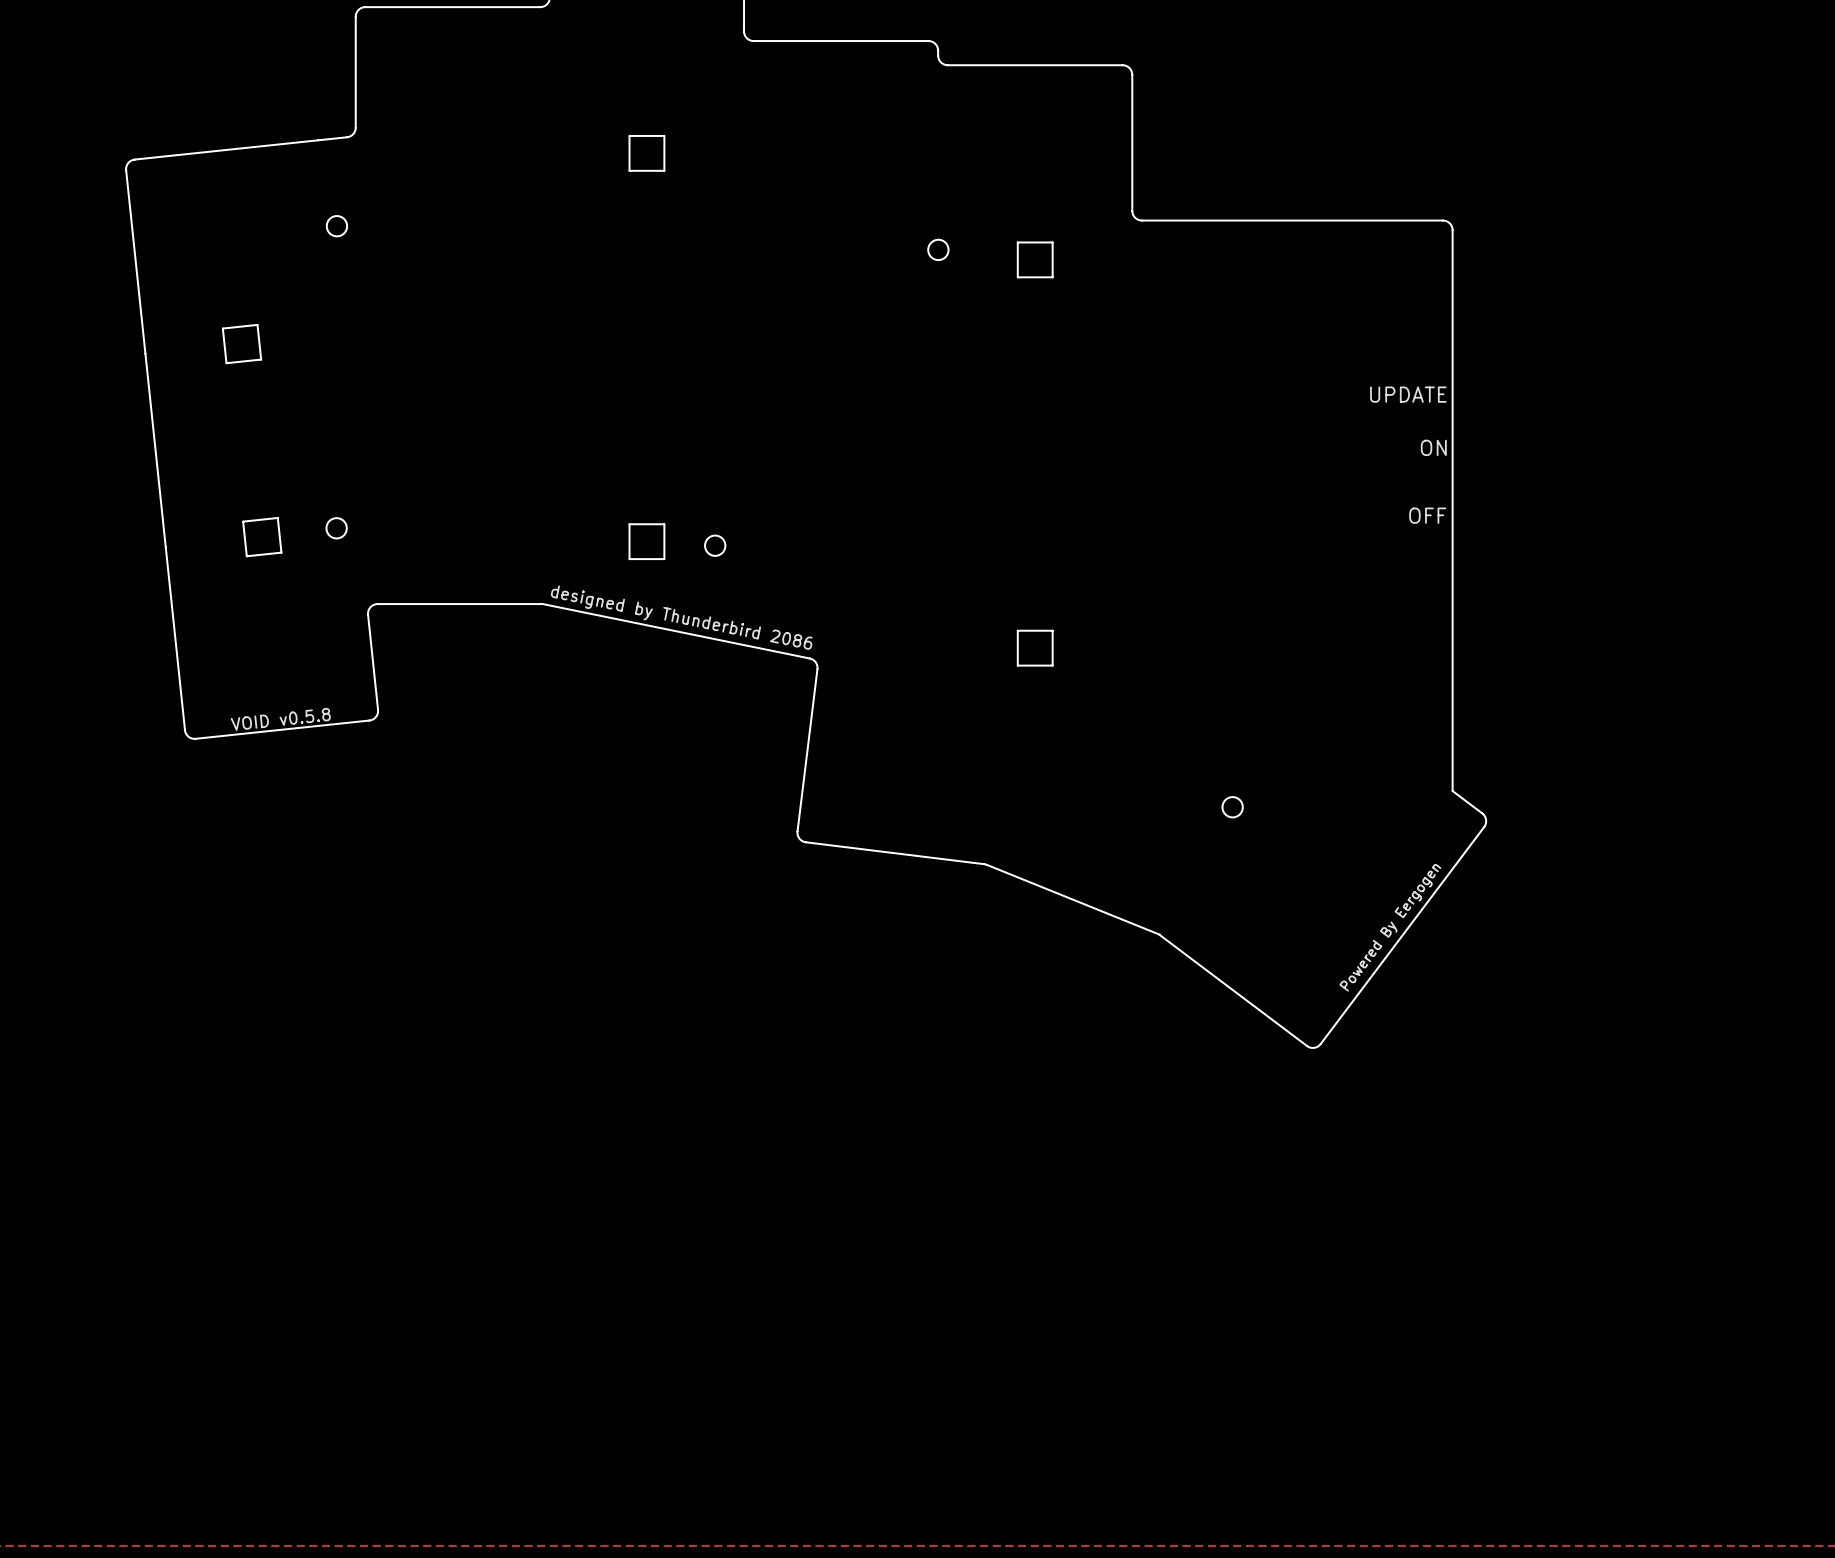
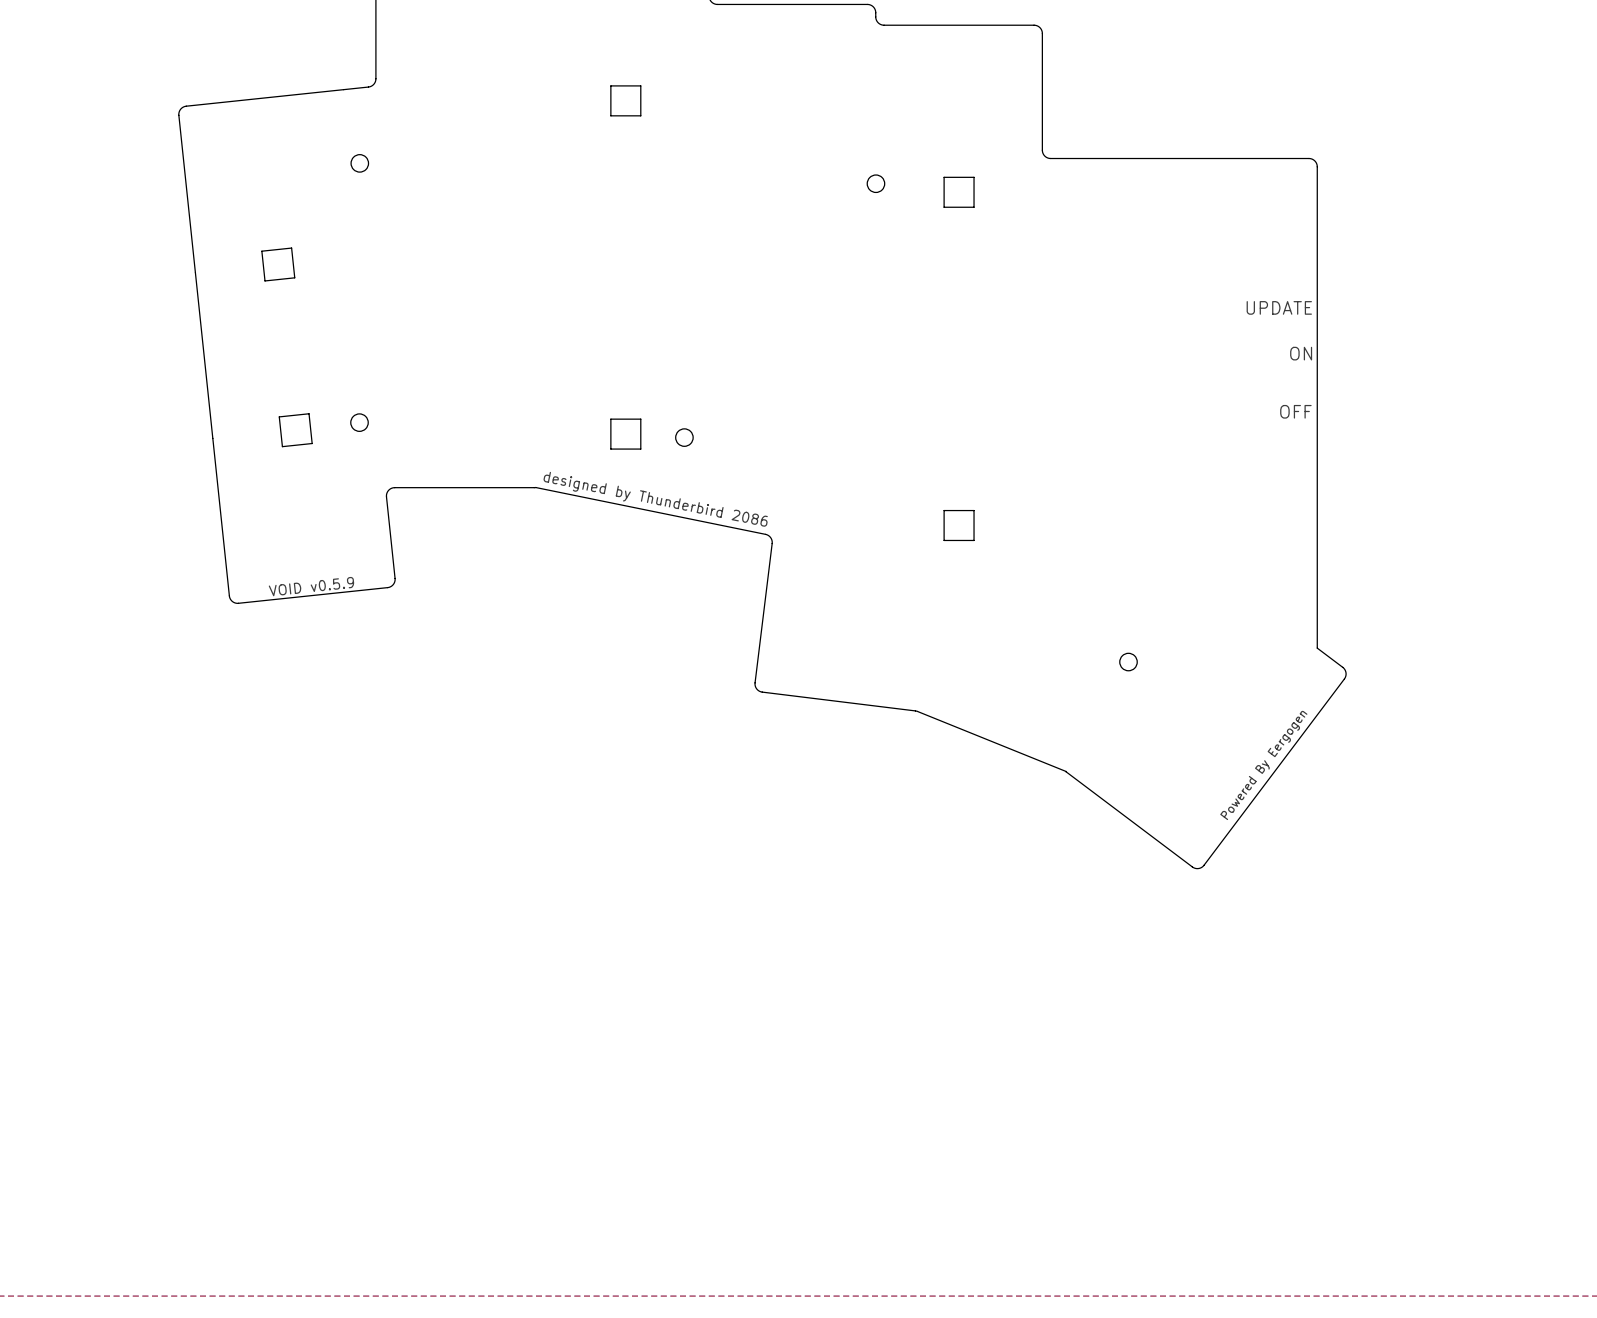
text: VOID v0.5.8 (280, 719) -> VOID v0.5.9 (311, 586)

